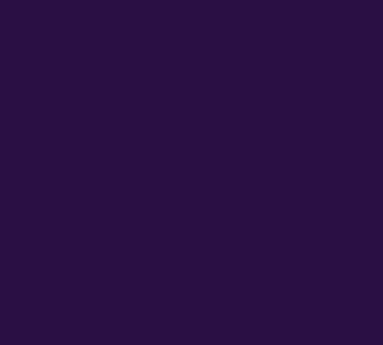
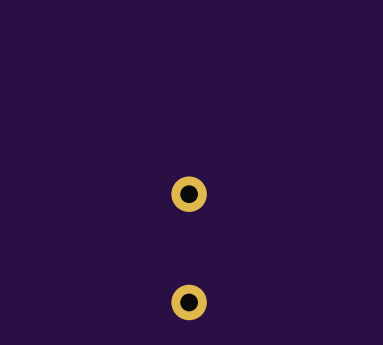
part: none -> (189, 194)
part: none -> (189, 302)

